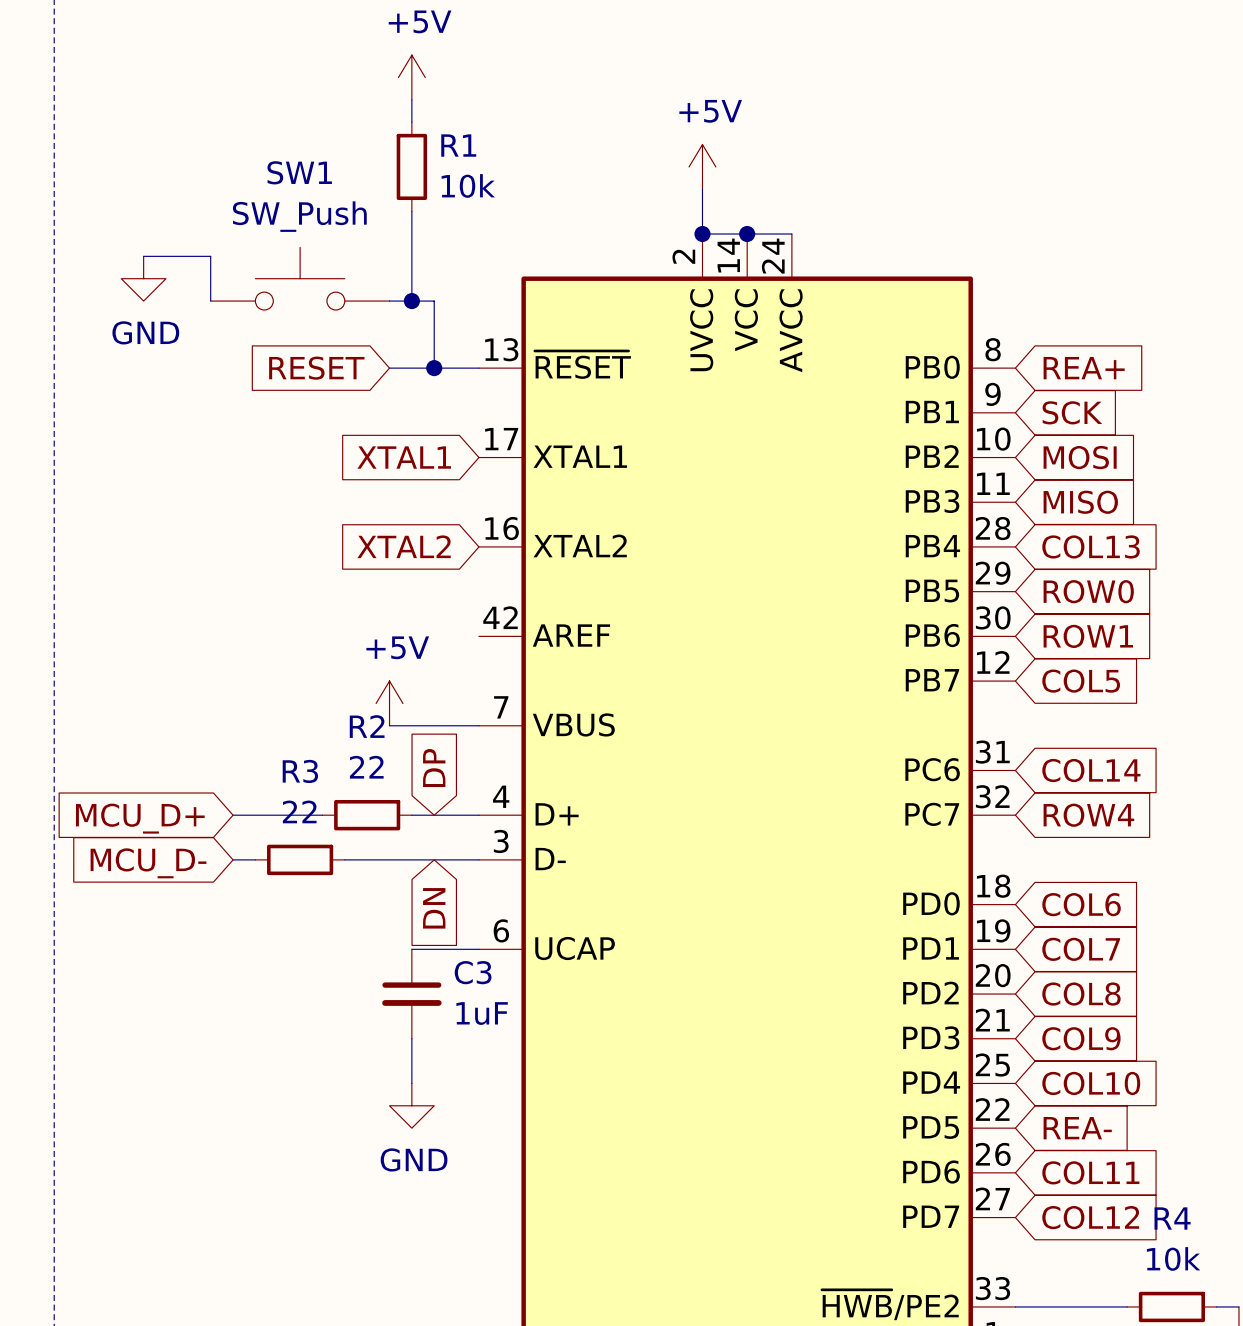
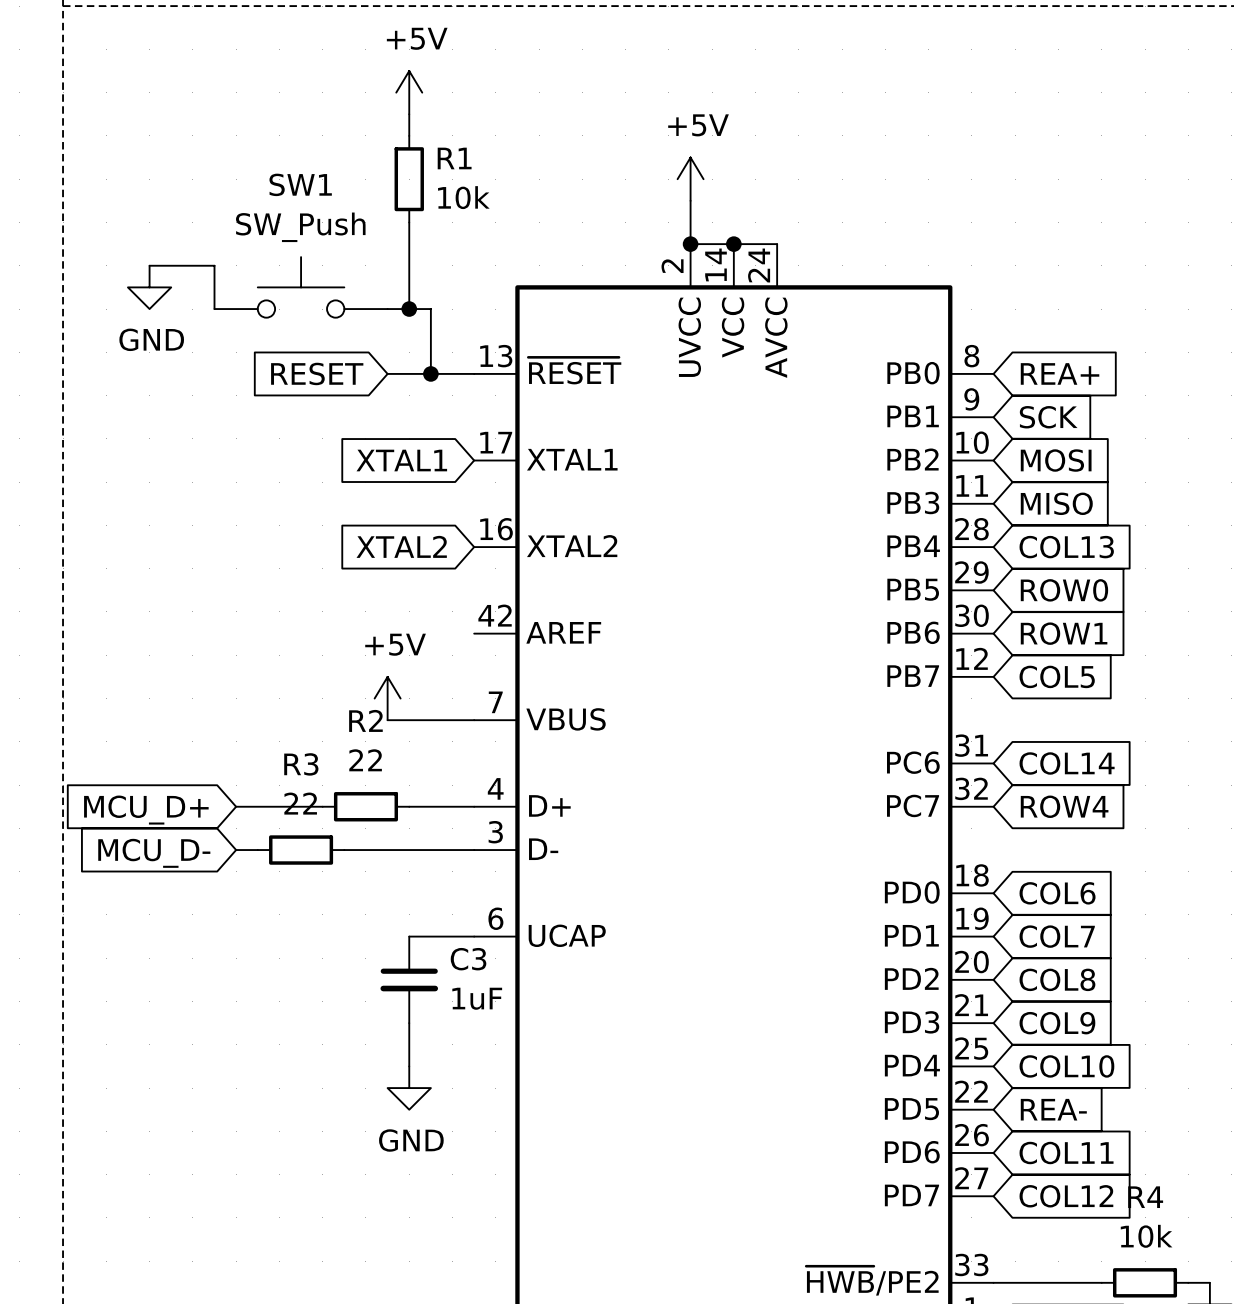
global label: DP (434, 768) -> none
global label: DN (434, 908) -> none

